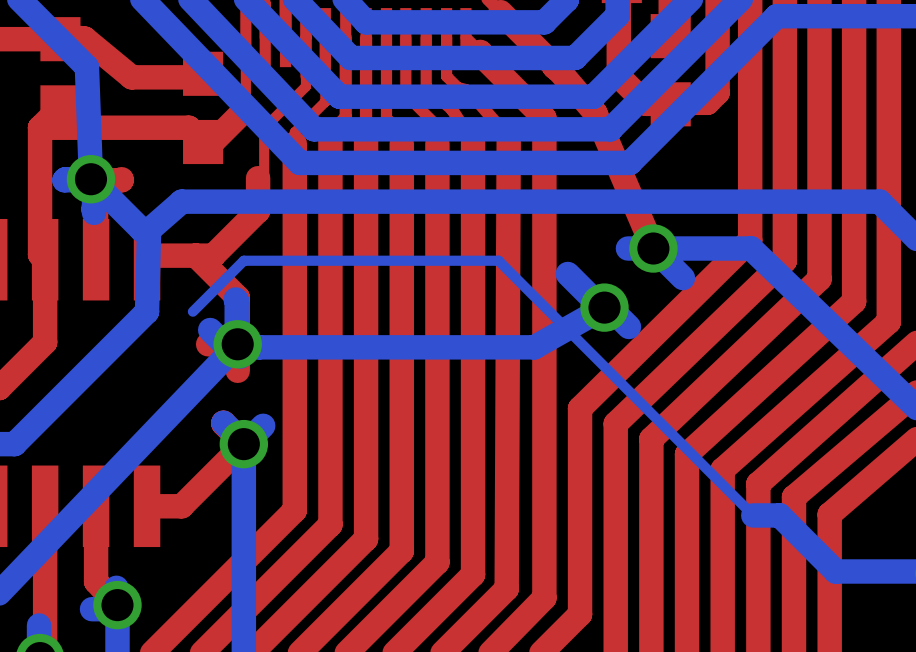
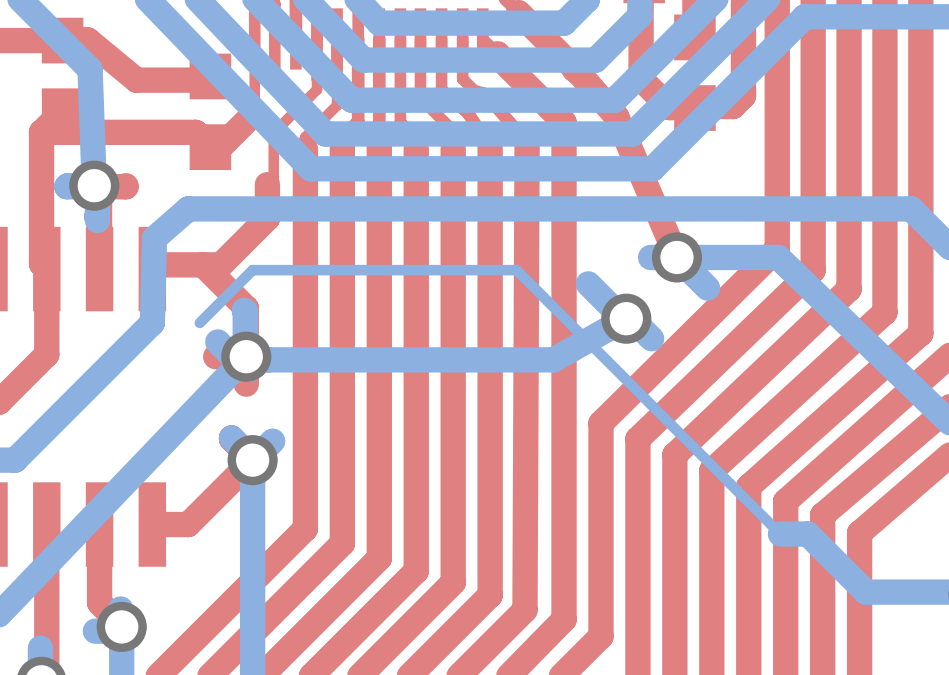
bottom track: (91, 179) (141, 230) (149, 230) -> none

